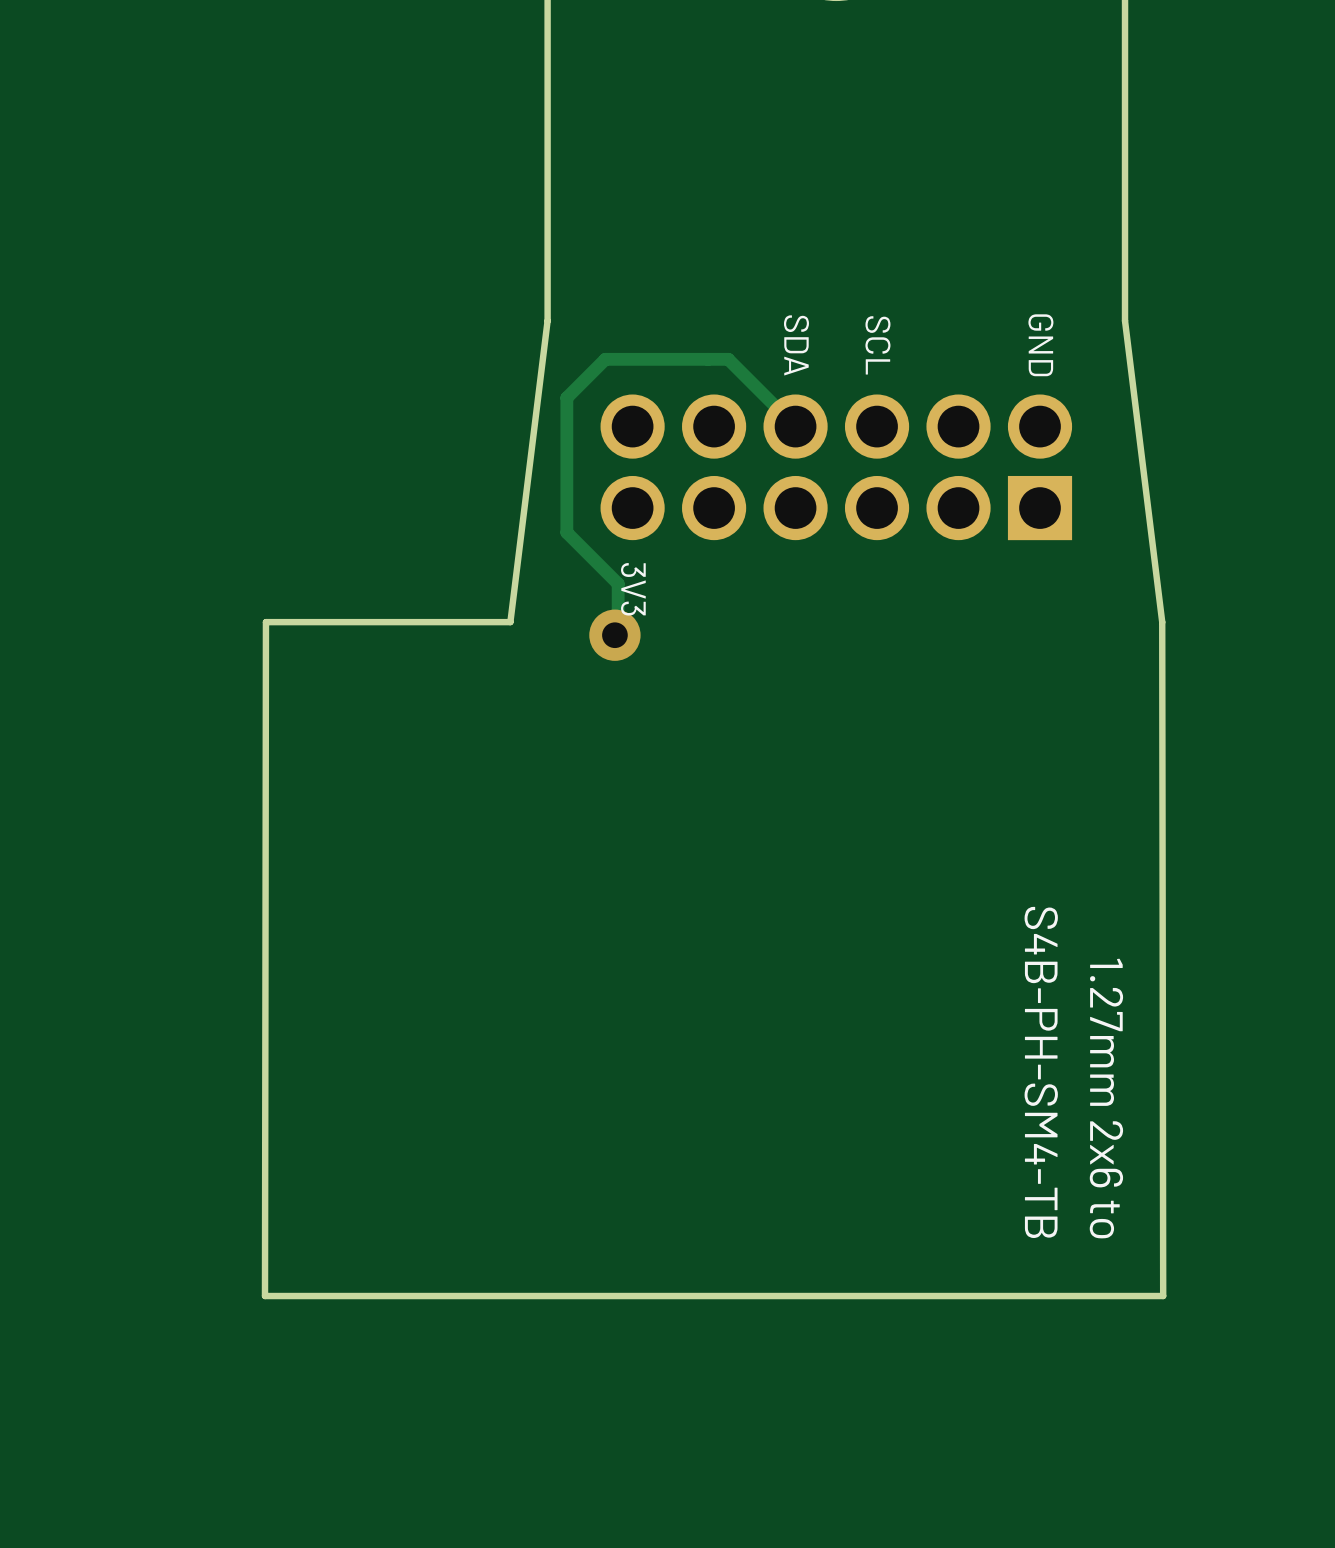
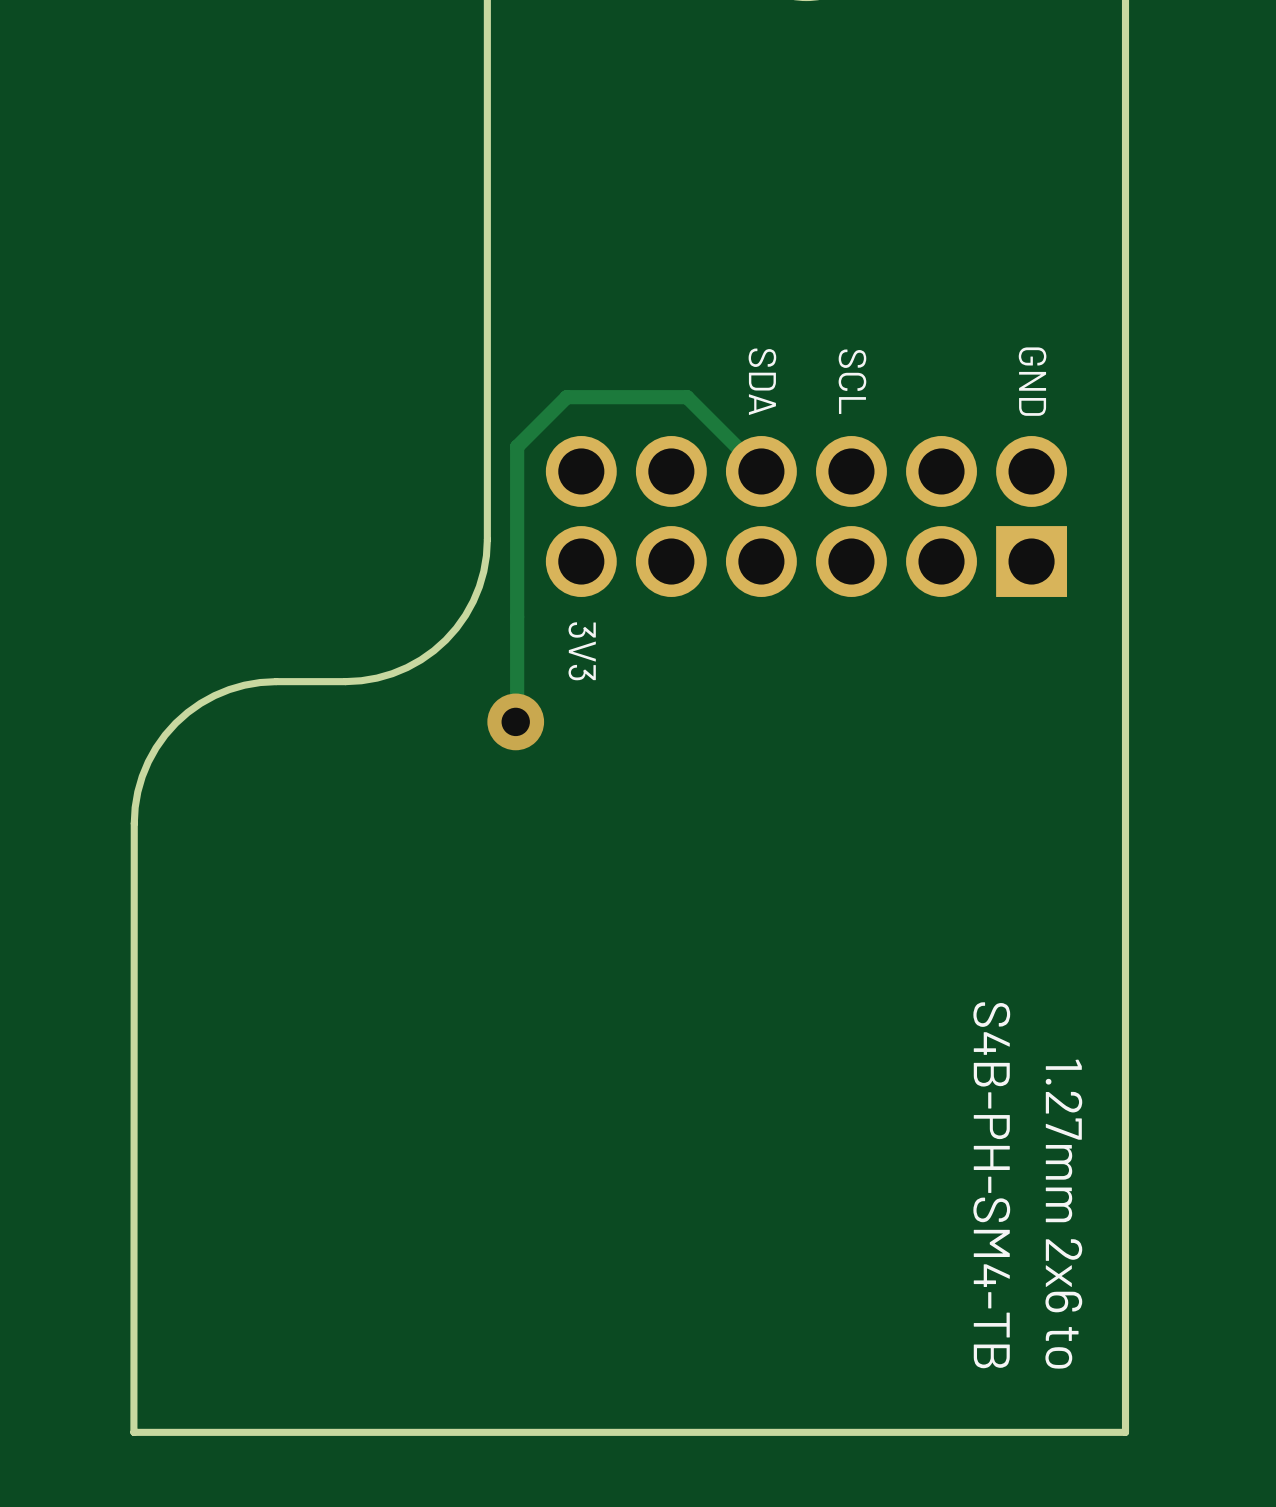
board edge: (547, 320) (510, 622) (265, 622) (264, 1296) -> (487, 354) (486, 555) (479, 586) (473, 601) (456, 628) (433, 650) (421, 659) (392, 673) (377, 678) (345, 681) (260, 682) (229, 689) (214, 695) (187, 712) (165, 735) (148, 761) (142, 776) (137, 791) (134, 823) (133, 1432) (175, 1432)
board edge: (1125, 320) (1162, 622) (1163, 1296) (1125, 1296) -> (1125, 354) (1125, 1432)
track: (619, 359) (605, 359) (566, 397) (566, 532) (618, 583) (618, 631) (614, 635) -> (566, 397) (517, 446) (515, 721)
via position: (614, 635) -> (515, 721)
text position: S4B-PH-SM4-TB (1041, 1072) -> S4B-PH-SM4-TB (991, 1185)
text position: 1.27mm 2x6 to (1106, 1098) -> 1.27mm 2x6 to (1063, 1214)

